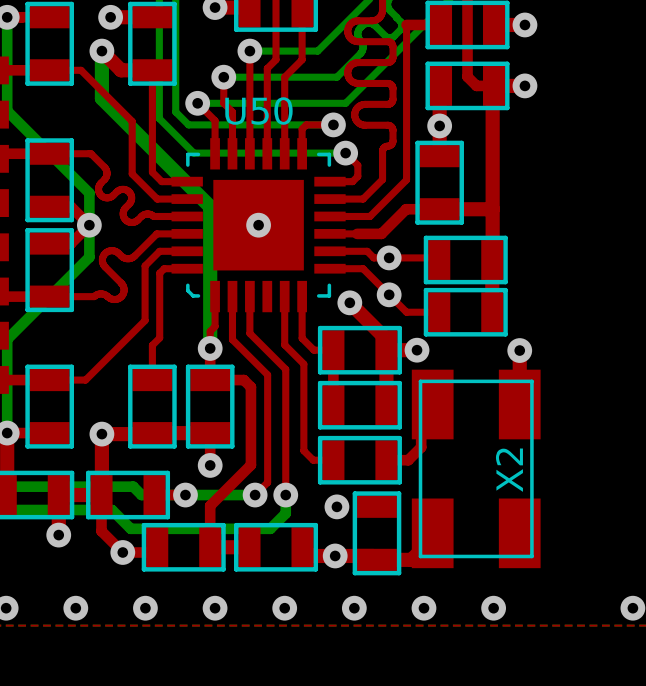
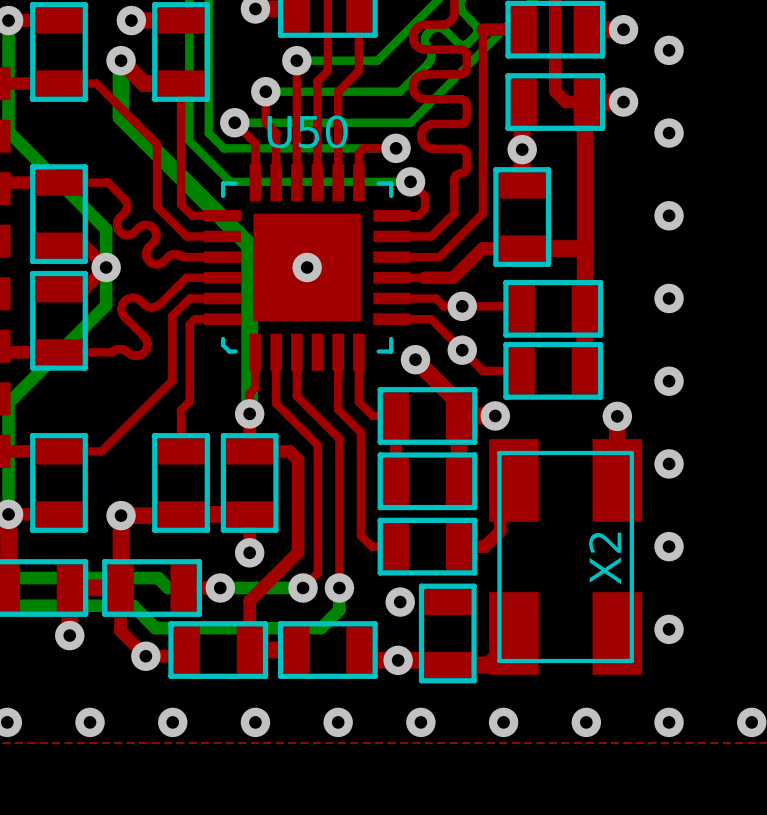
via: none -> (669, 50)
via: none -> (669, 133)
via: none -> (669, 215)
via: none -> (669, 298)
via: none -> (669, 381)
via: none -> (669, 463)
via: none -> (669, 546)
via: none -> (669, 629)
via: none -> (669, 722)

